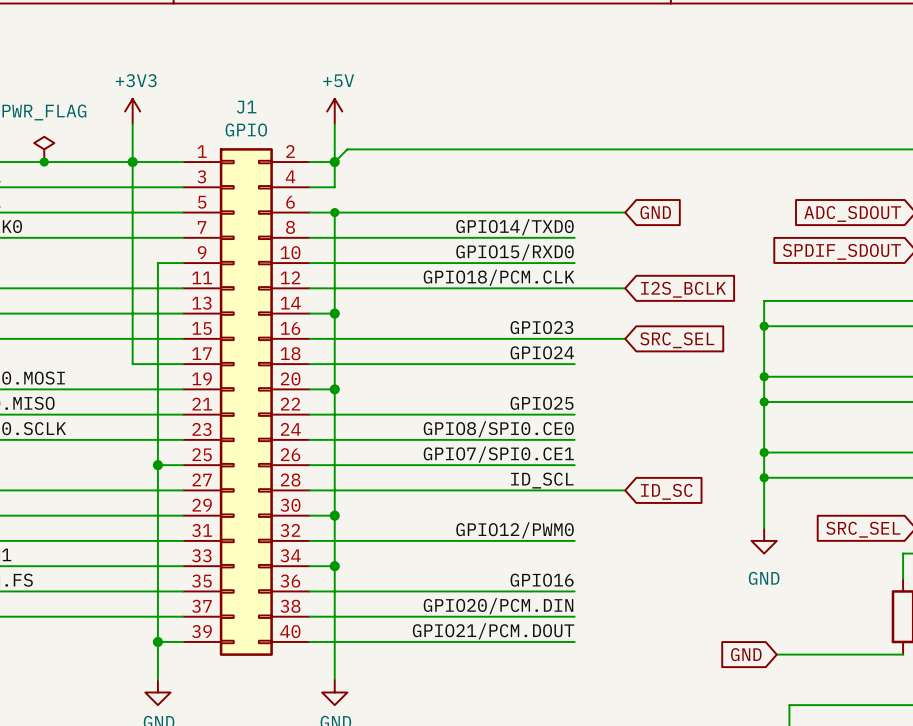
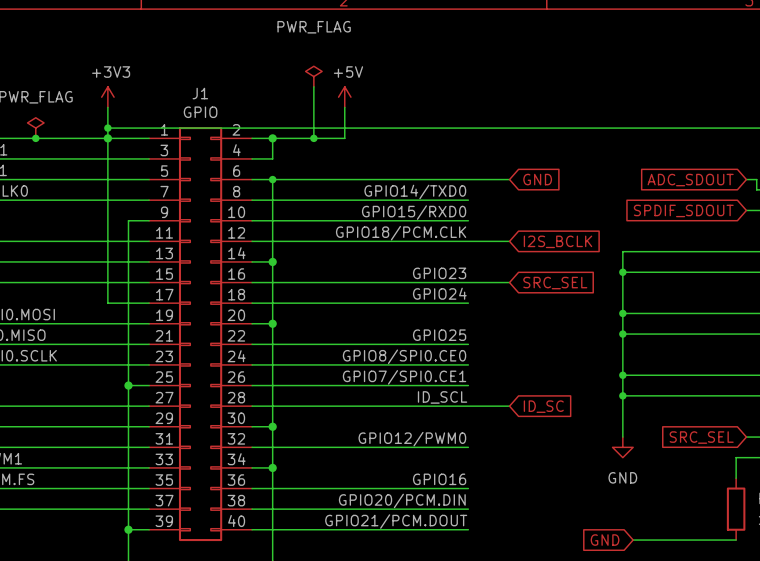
power symbol: none -> PWR_FLAG (313, 76)
wire: none -> (313, 86) (313, 138)
power symbol position: +5V (334, 111) -> +5V (344, 97)
wire: (334, 124) (334, 162) (347, 149) -> (107, 128) (282, 128)
wire: none -> (344, 107) (344, 138) (272, 138)
junction: none -> (107, 128)
junction: none -> (313, 138)

